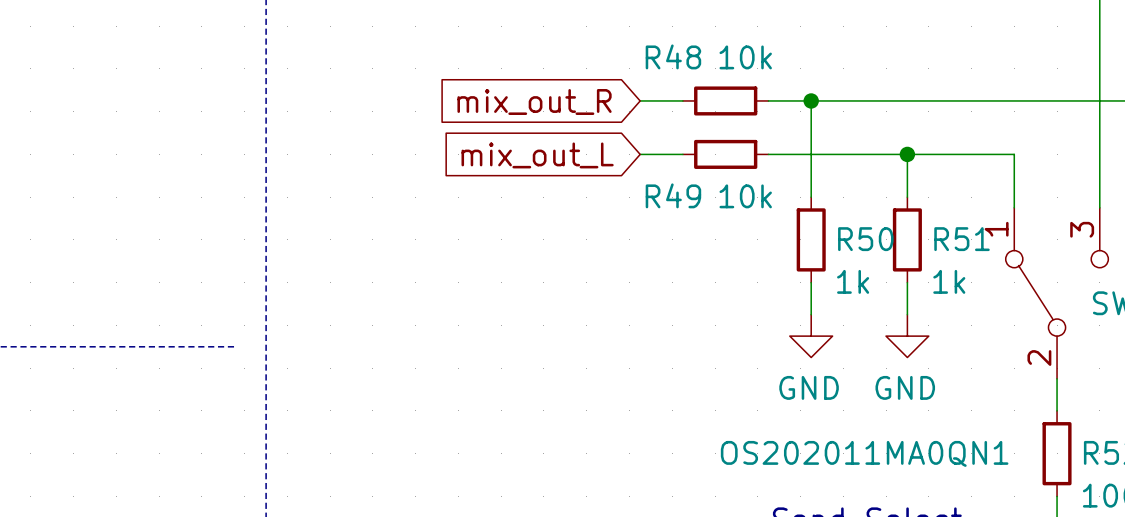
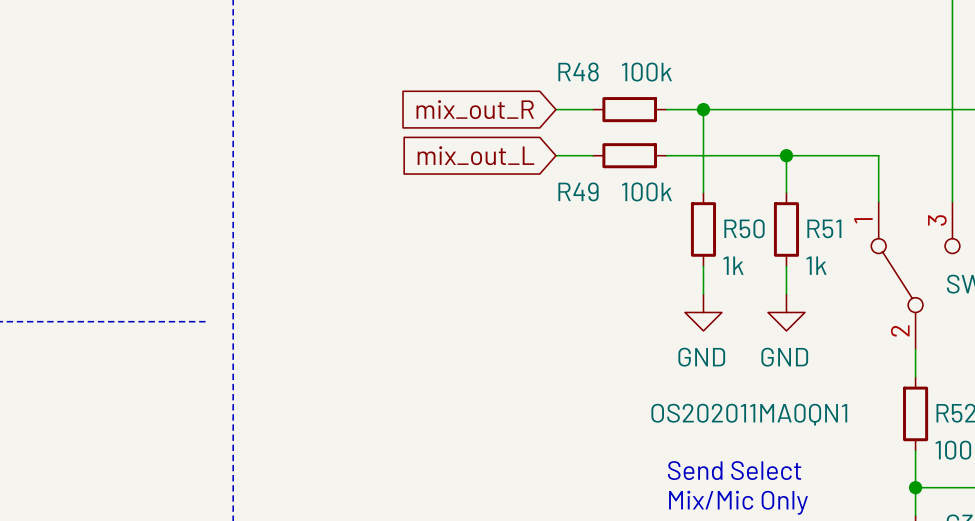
R48 value: 10k (745, 57) -> 100k (646, 72)
R49 value: 10k (745, 196) -> 100k (646, 191)

